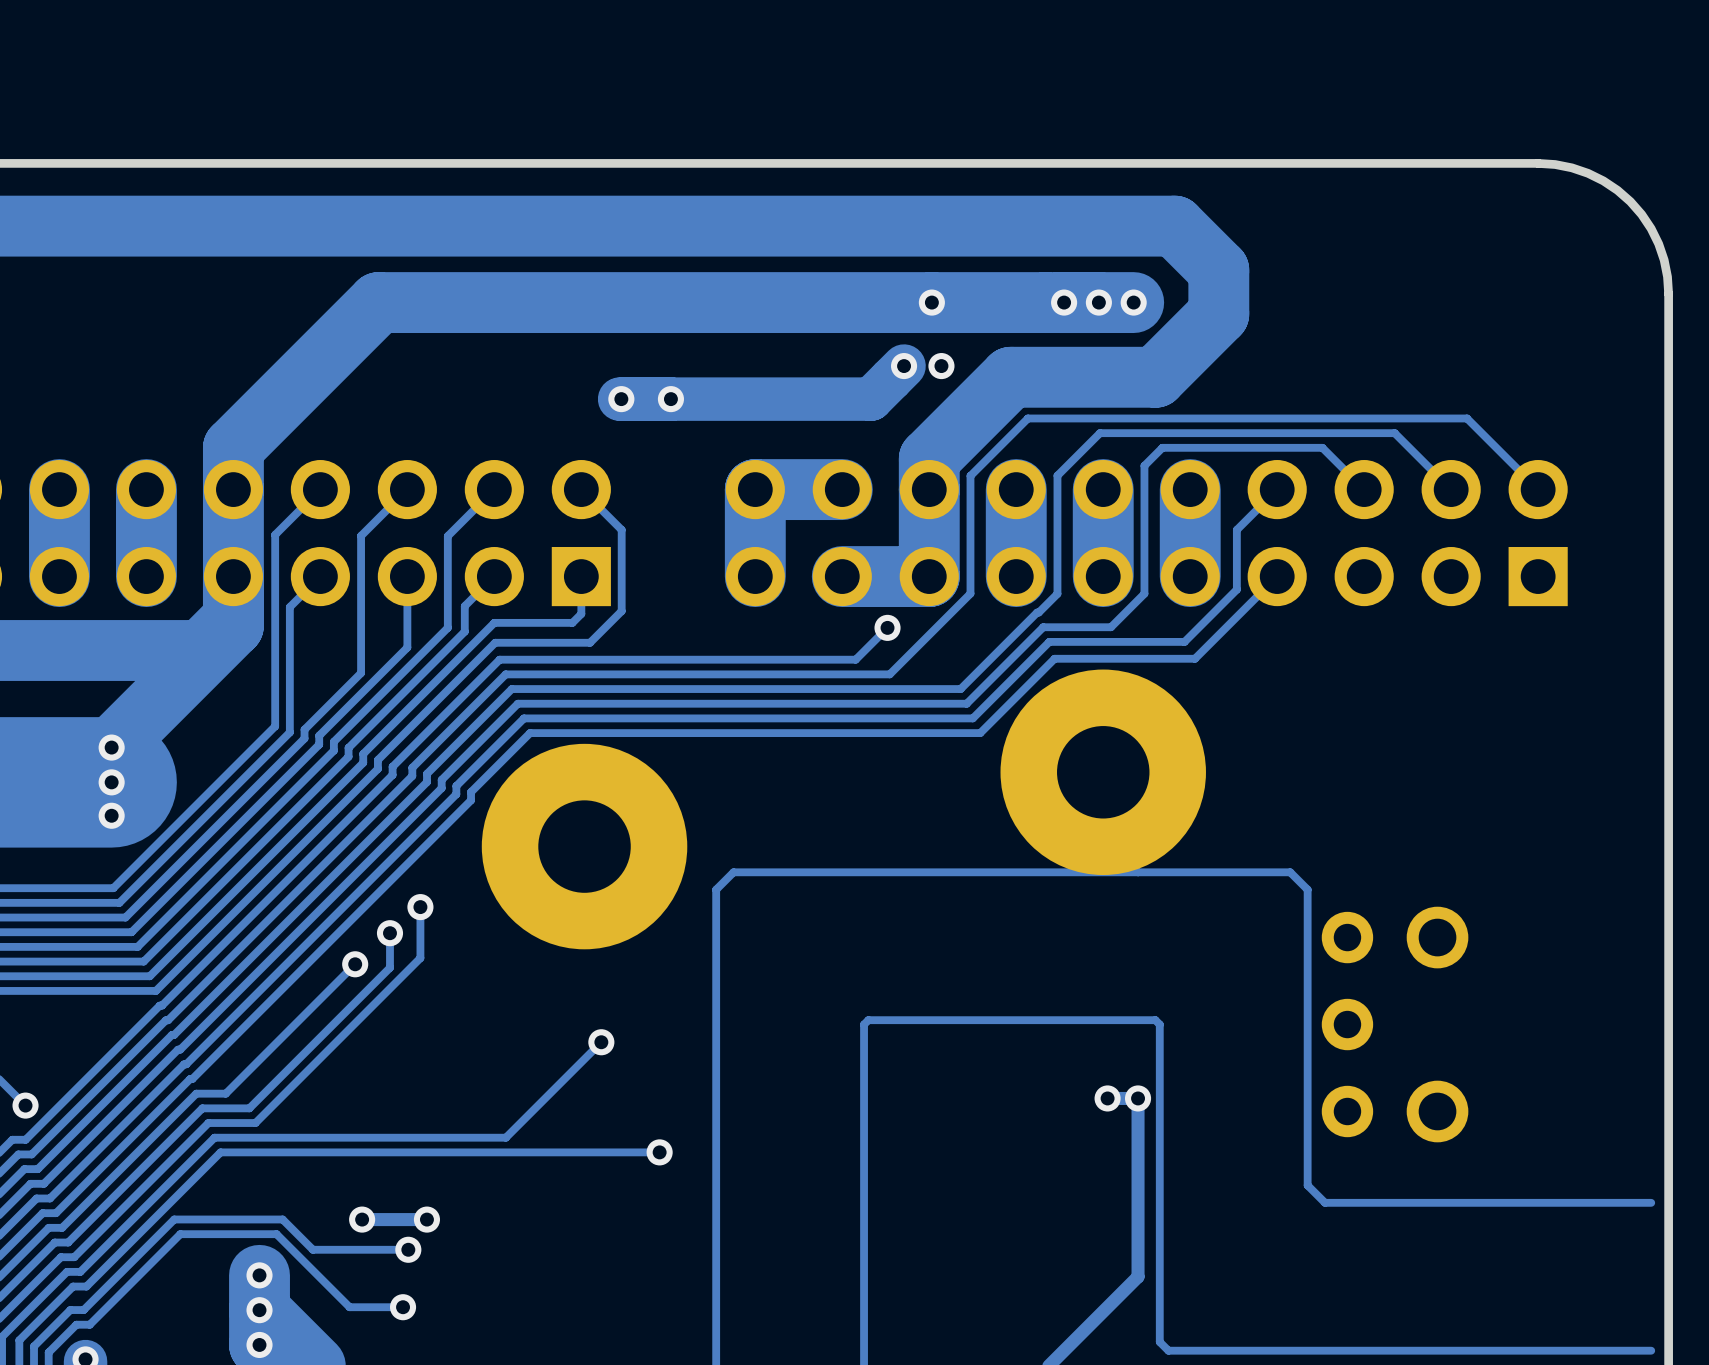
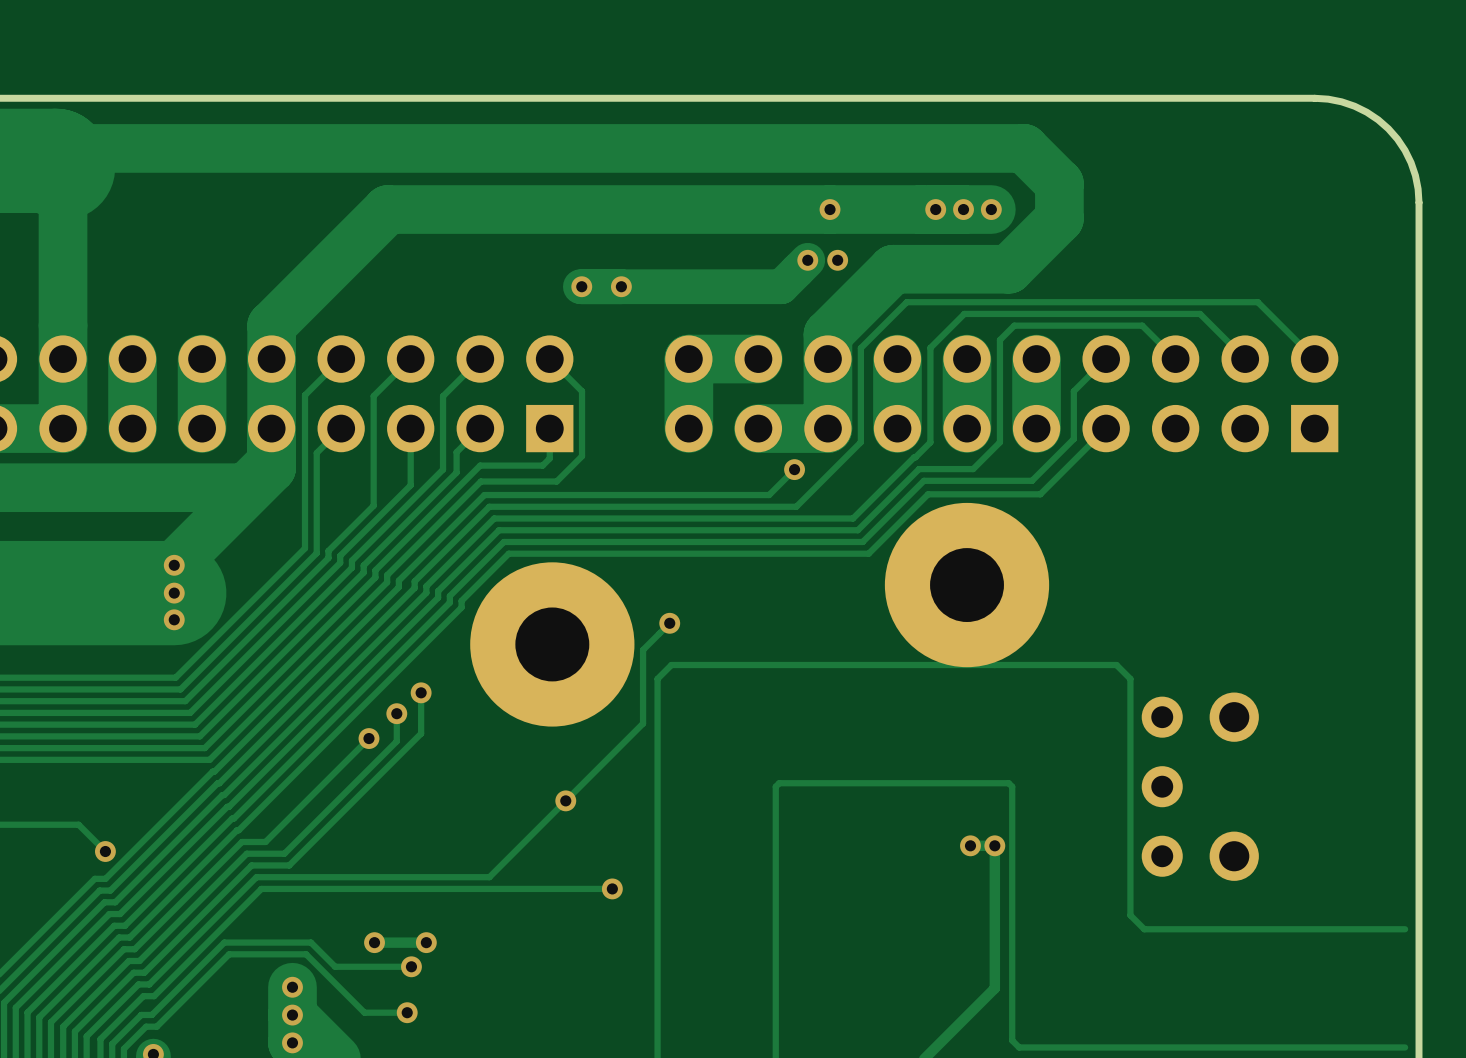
track: none -> (669, 623) (643, 649) (643, 723) (565, 800)
via: none -> (669, 623)

